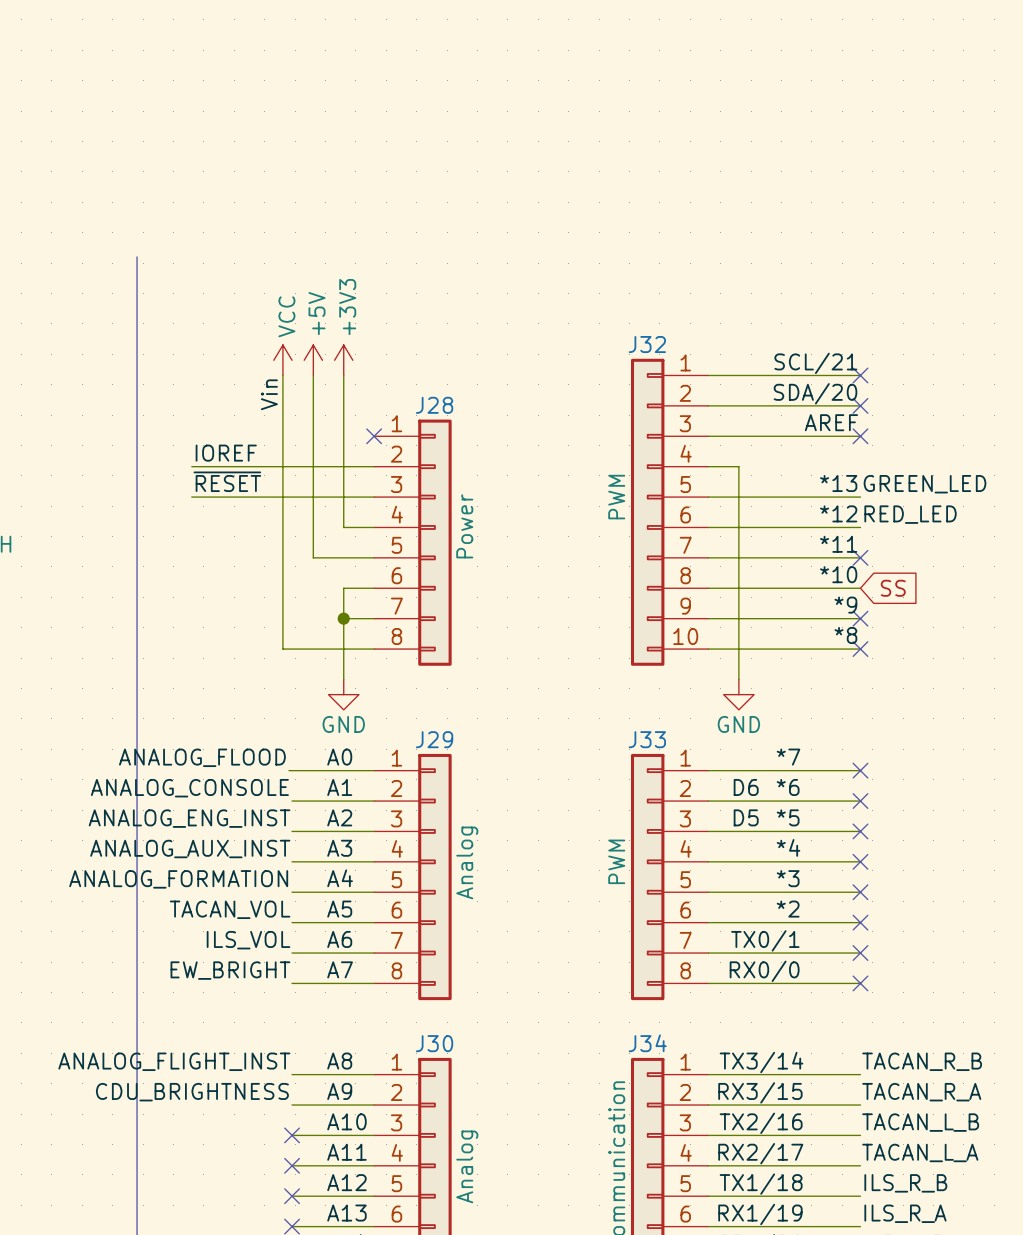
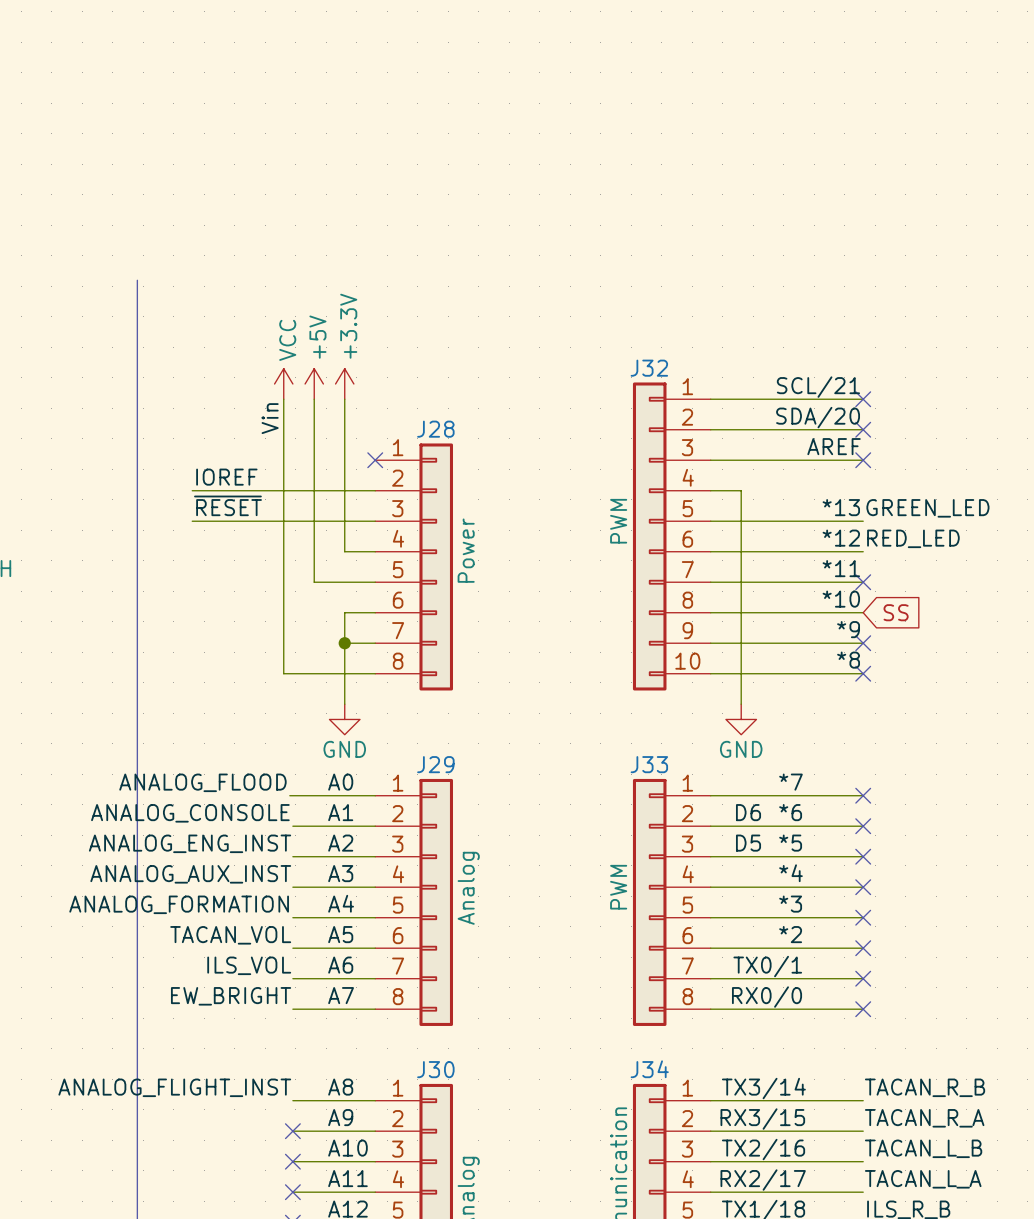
power symbol: +3V3 (343, 360) -> +3.3V (344, 383)
label: CDU_BRIGHTNESS (192, 1092) -> none
no-connect mark: none -> (292, 1131)

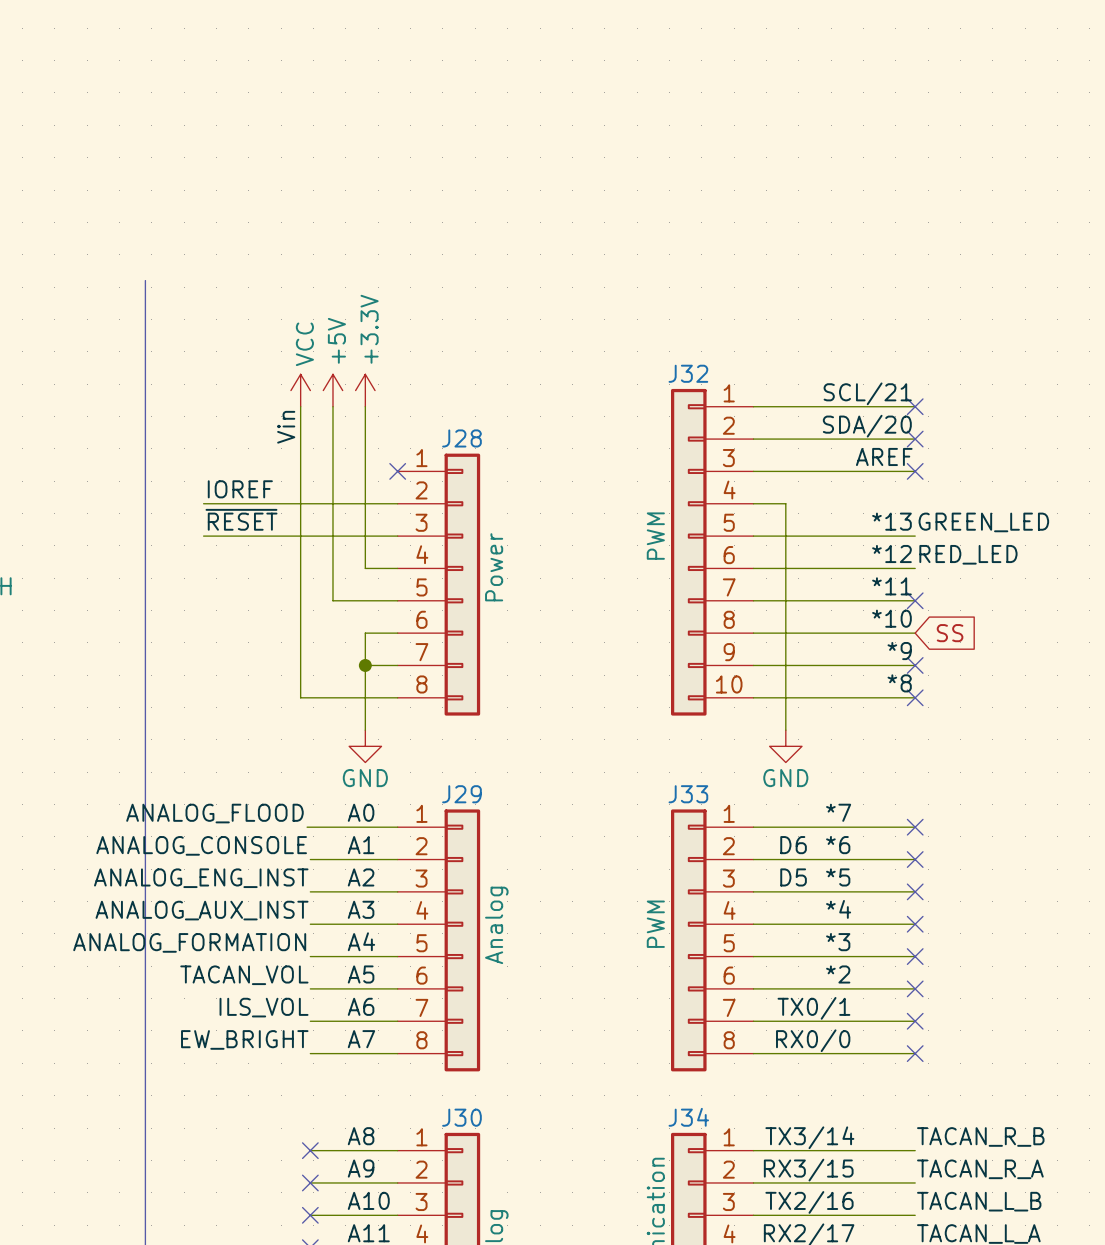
label: ANALOG_FLIGHT_INST (174, 1087) -> none
no-connect mark: none -> (310, 1150)

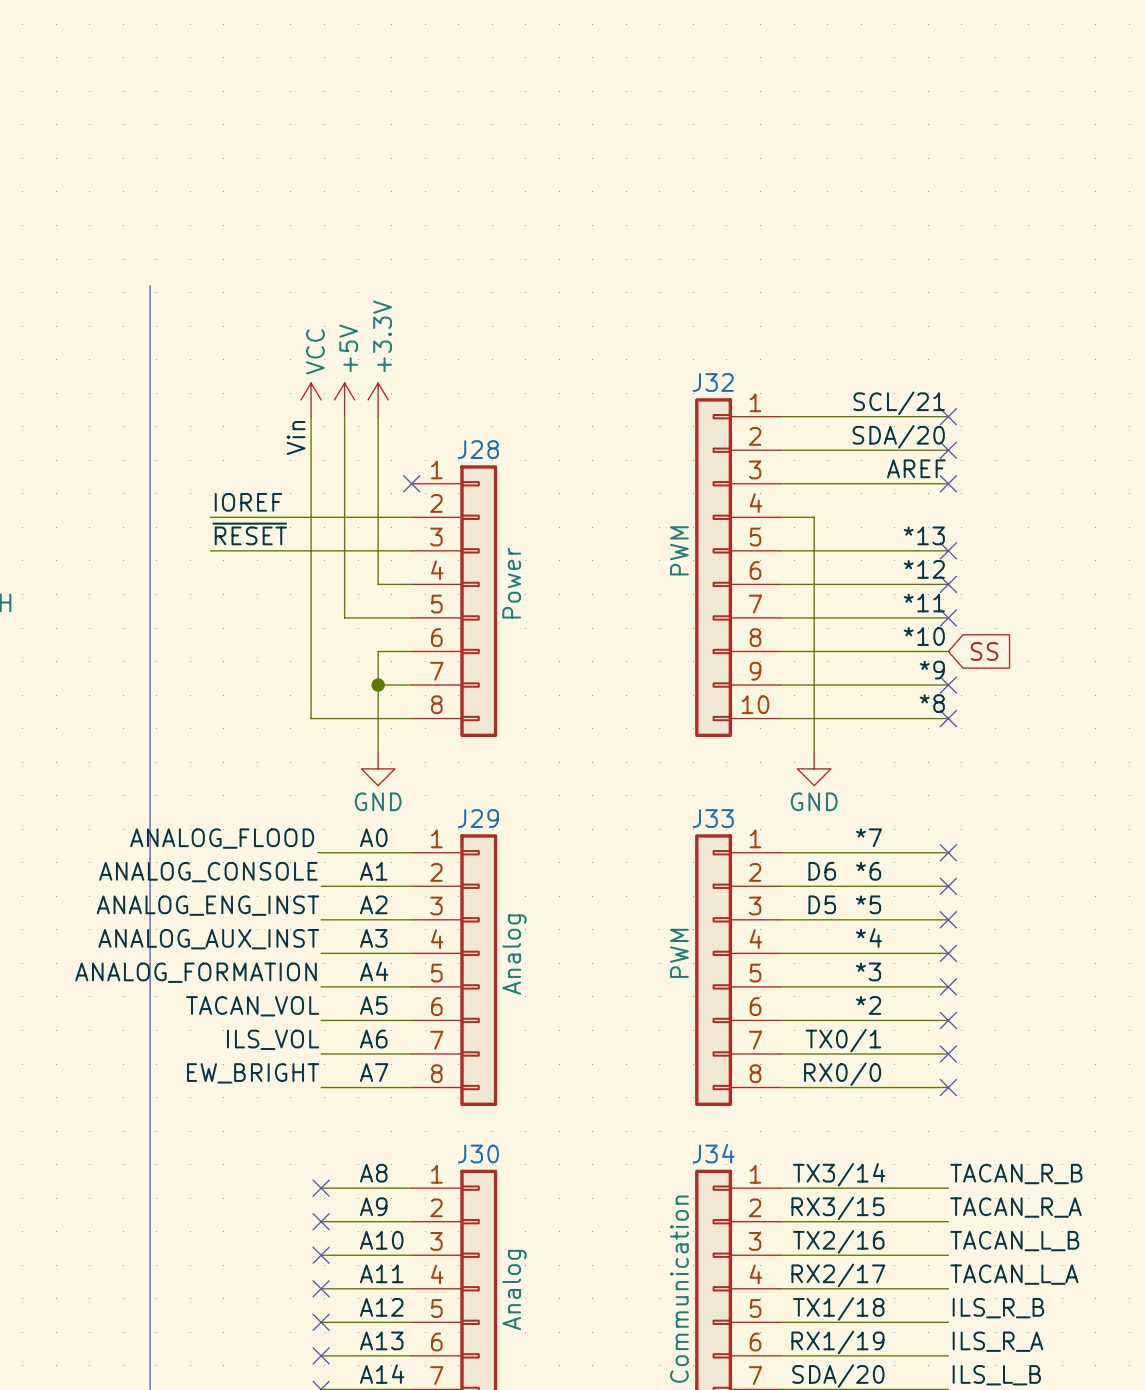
label: GREEN_LED (983, 522) -> none
no-connect mark: none -> (948, 550)
label: RED_LED (968, 554) -> none
no-connect mark: none -> (948, 584)

